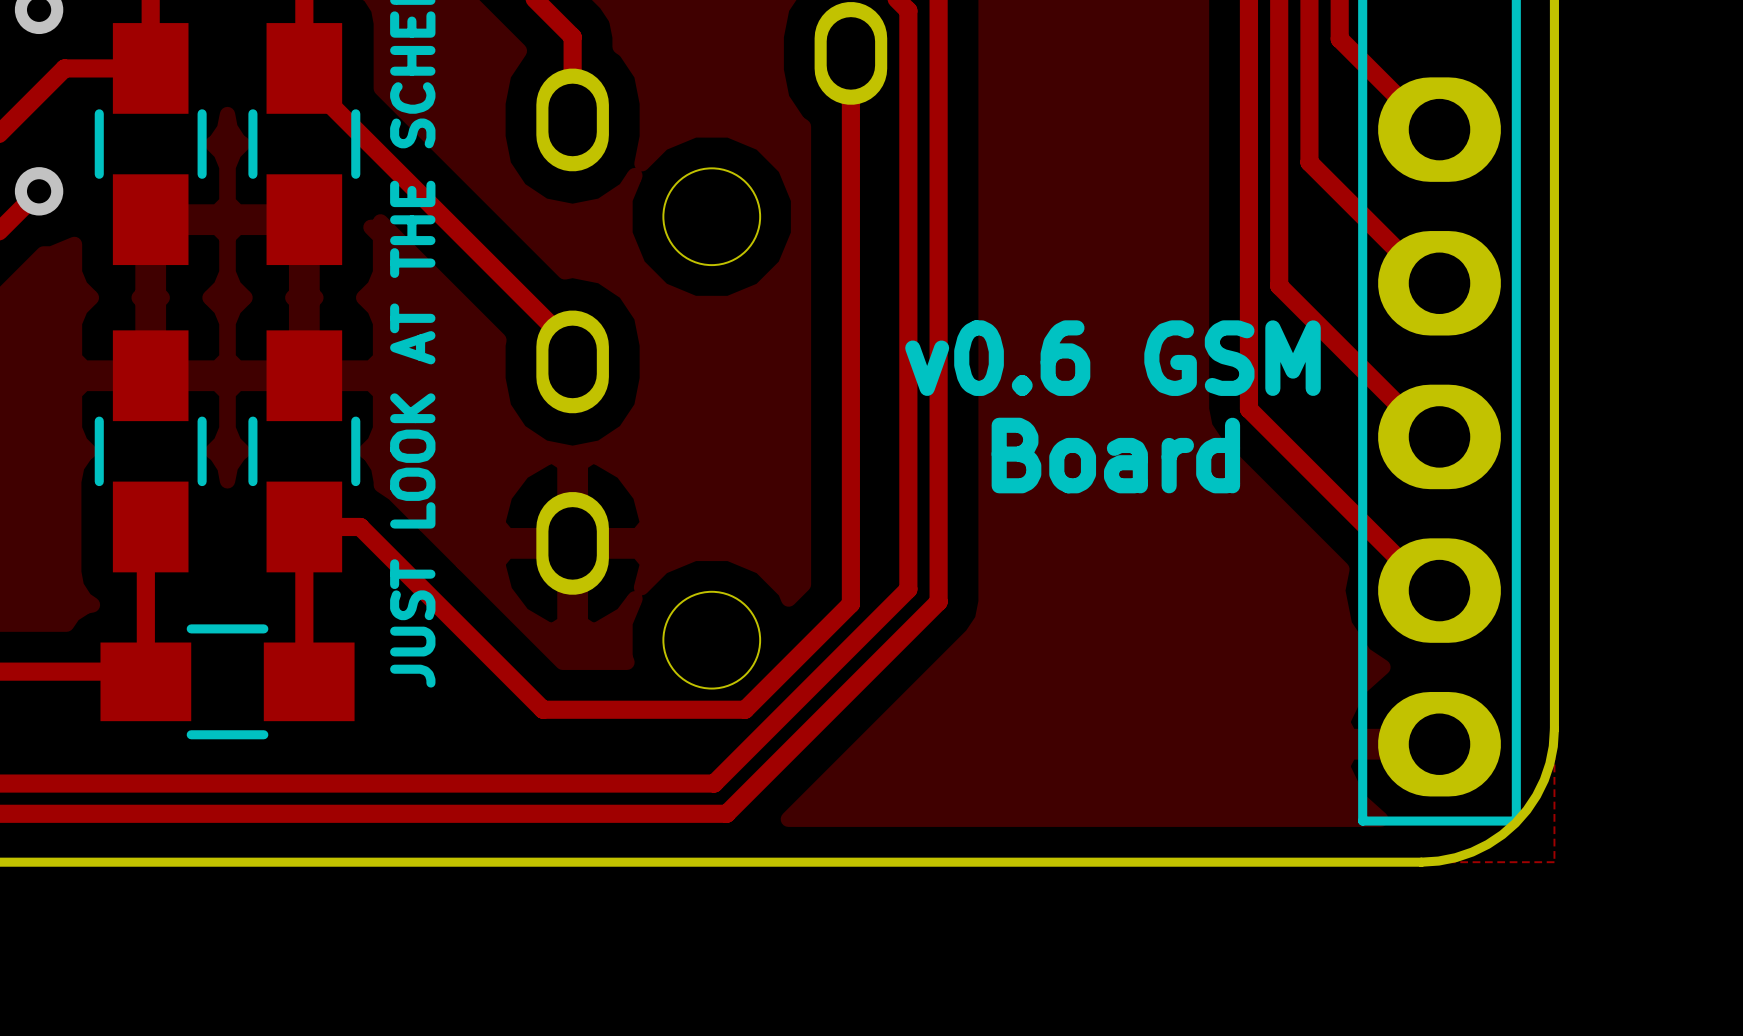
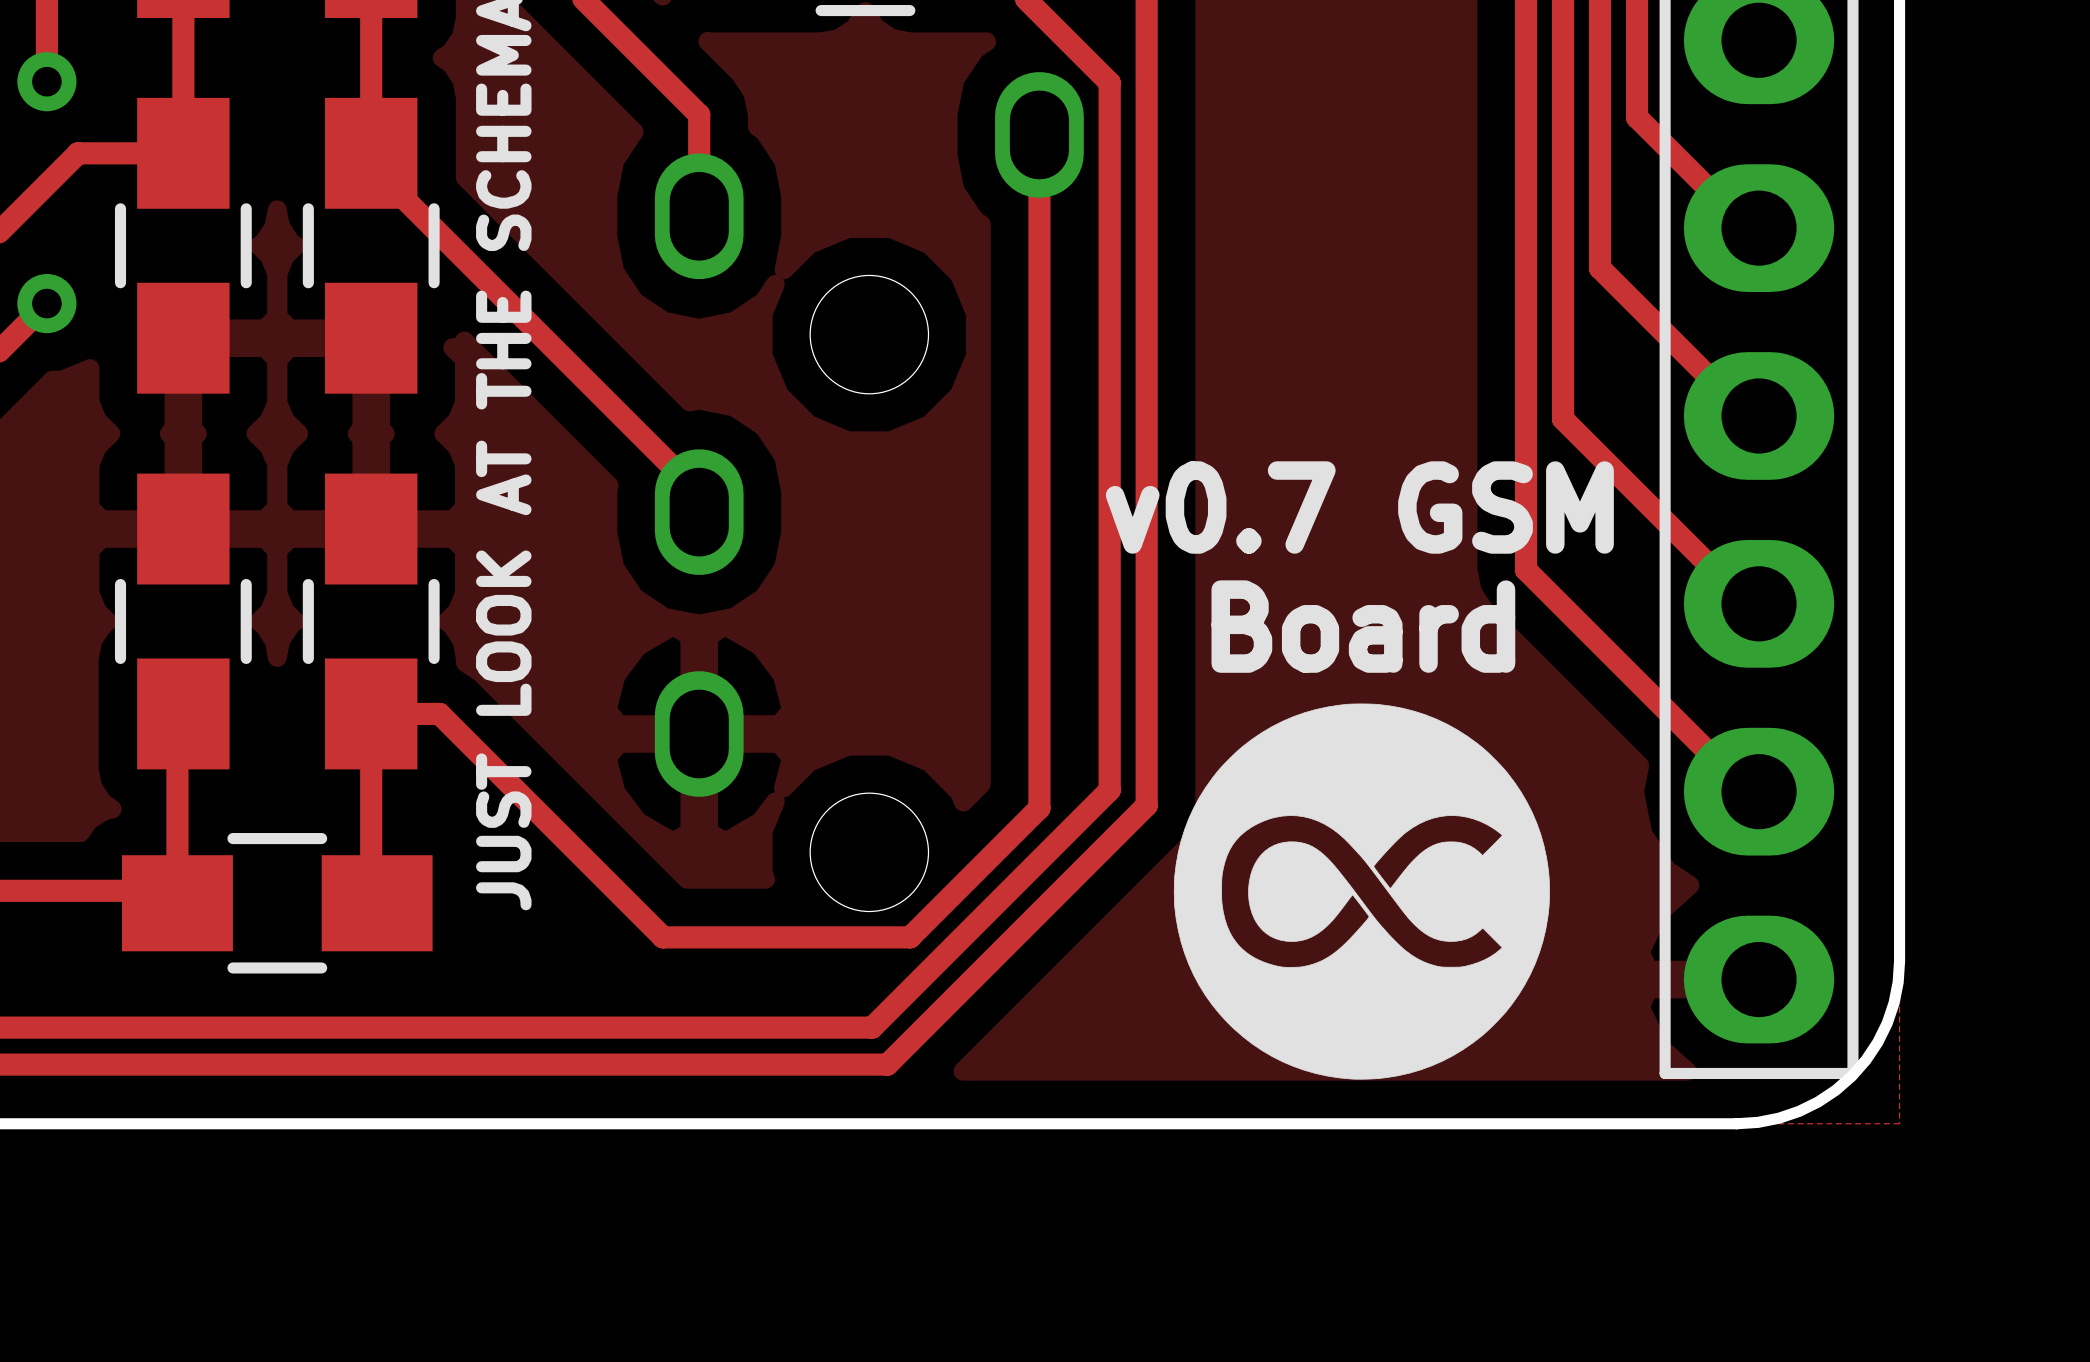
text: v0.6 GSM (1112, 358) -> v0.7 GSM (1359, 507)
drawing: none -> [1173, 703, 1550, 1080]

